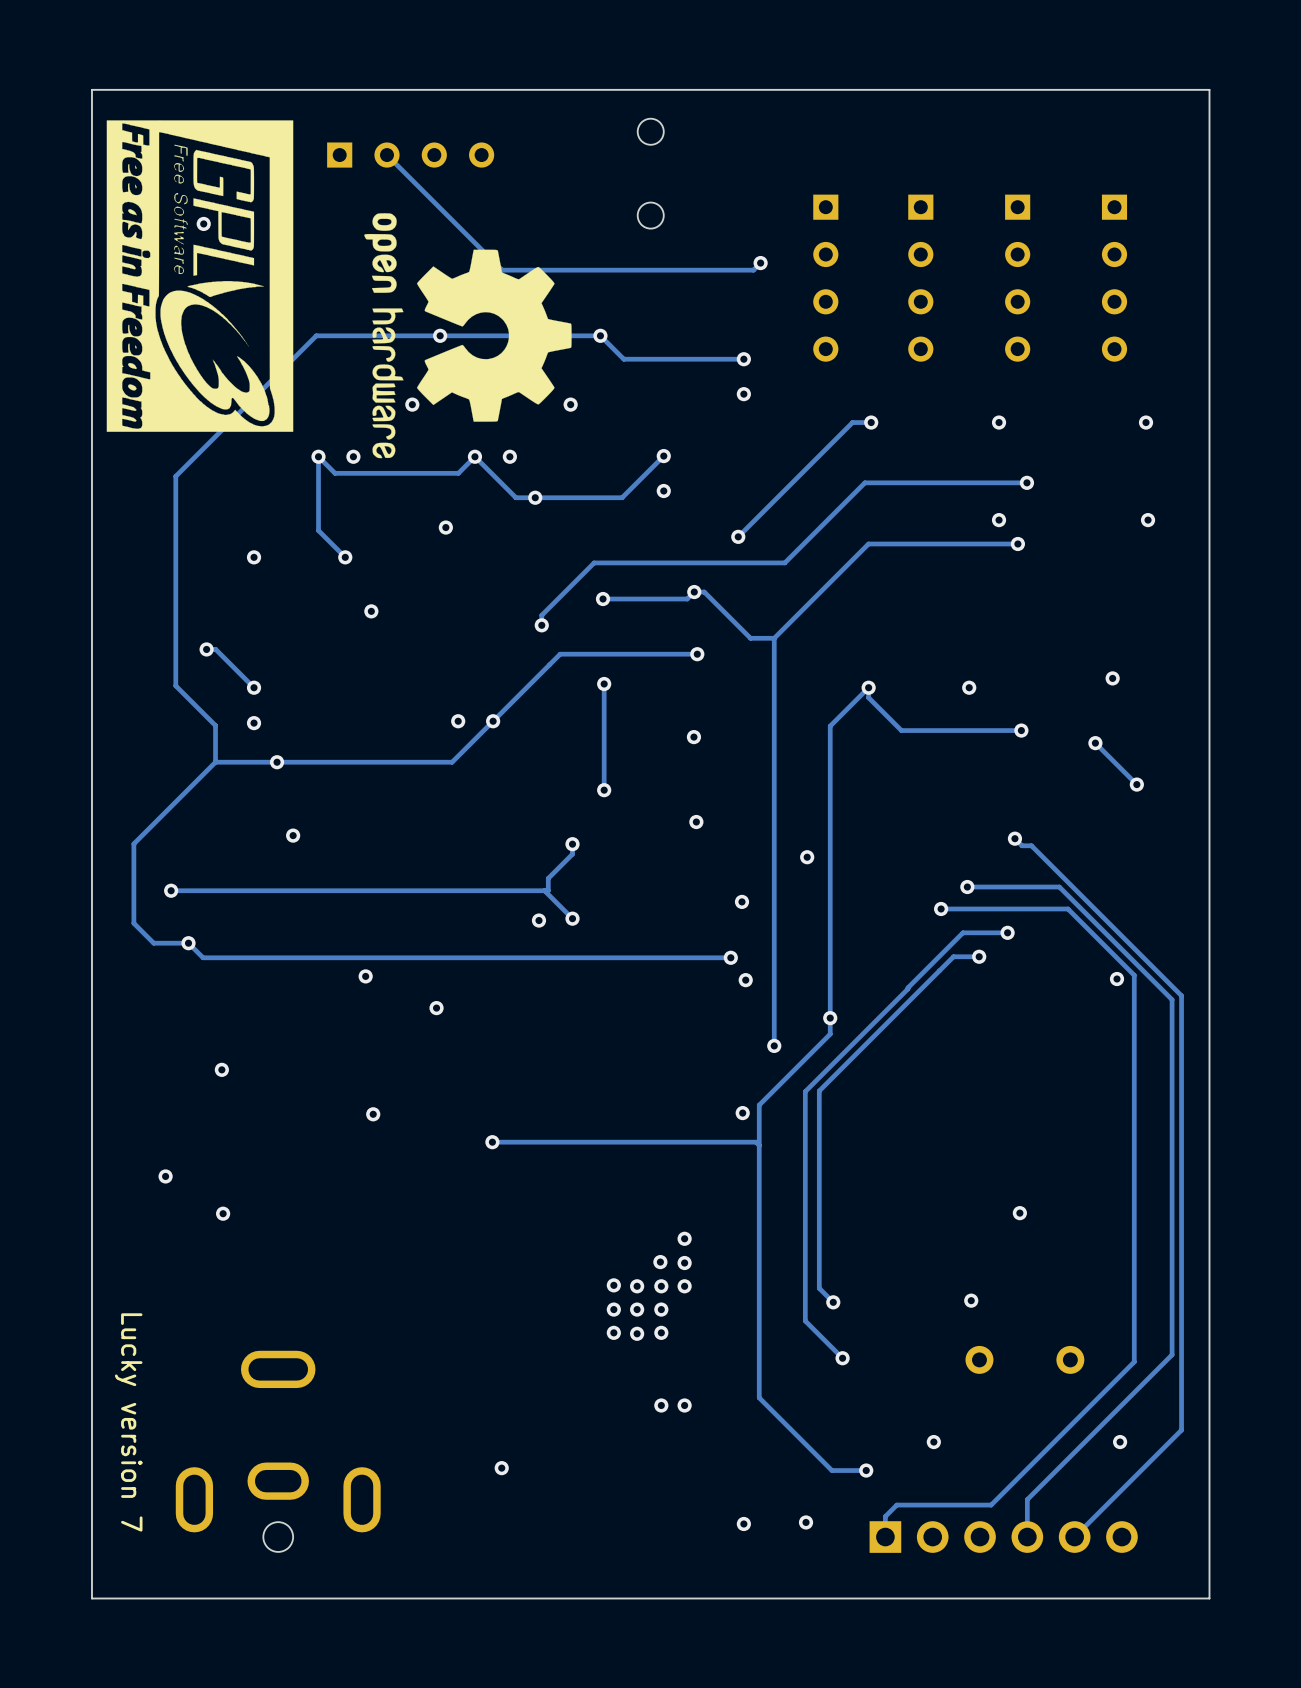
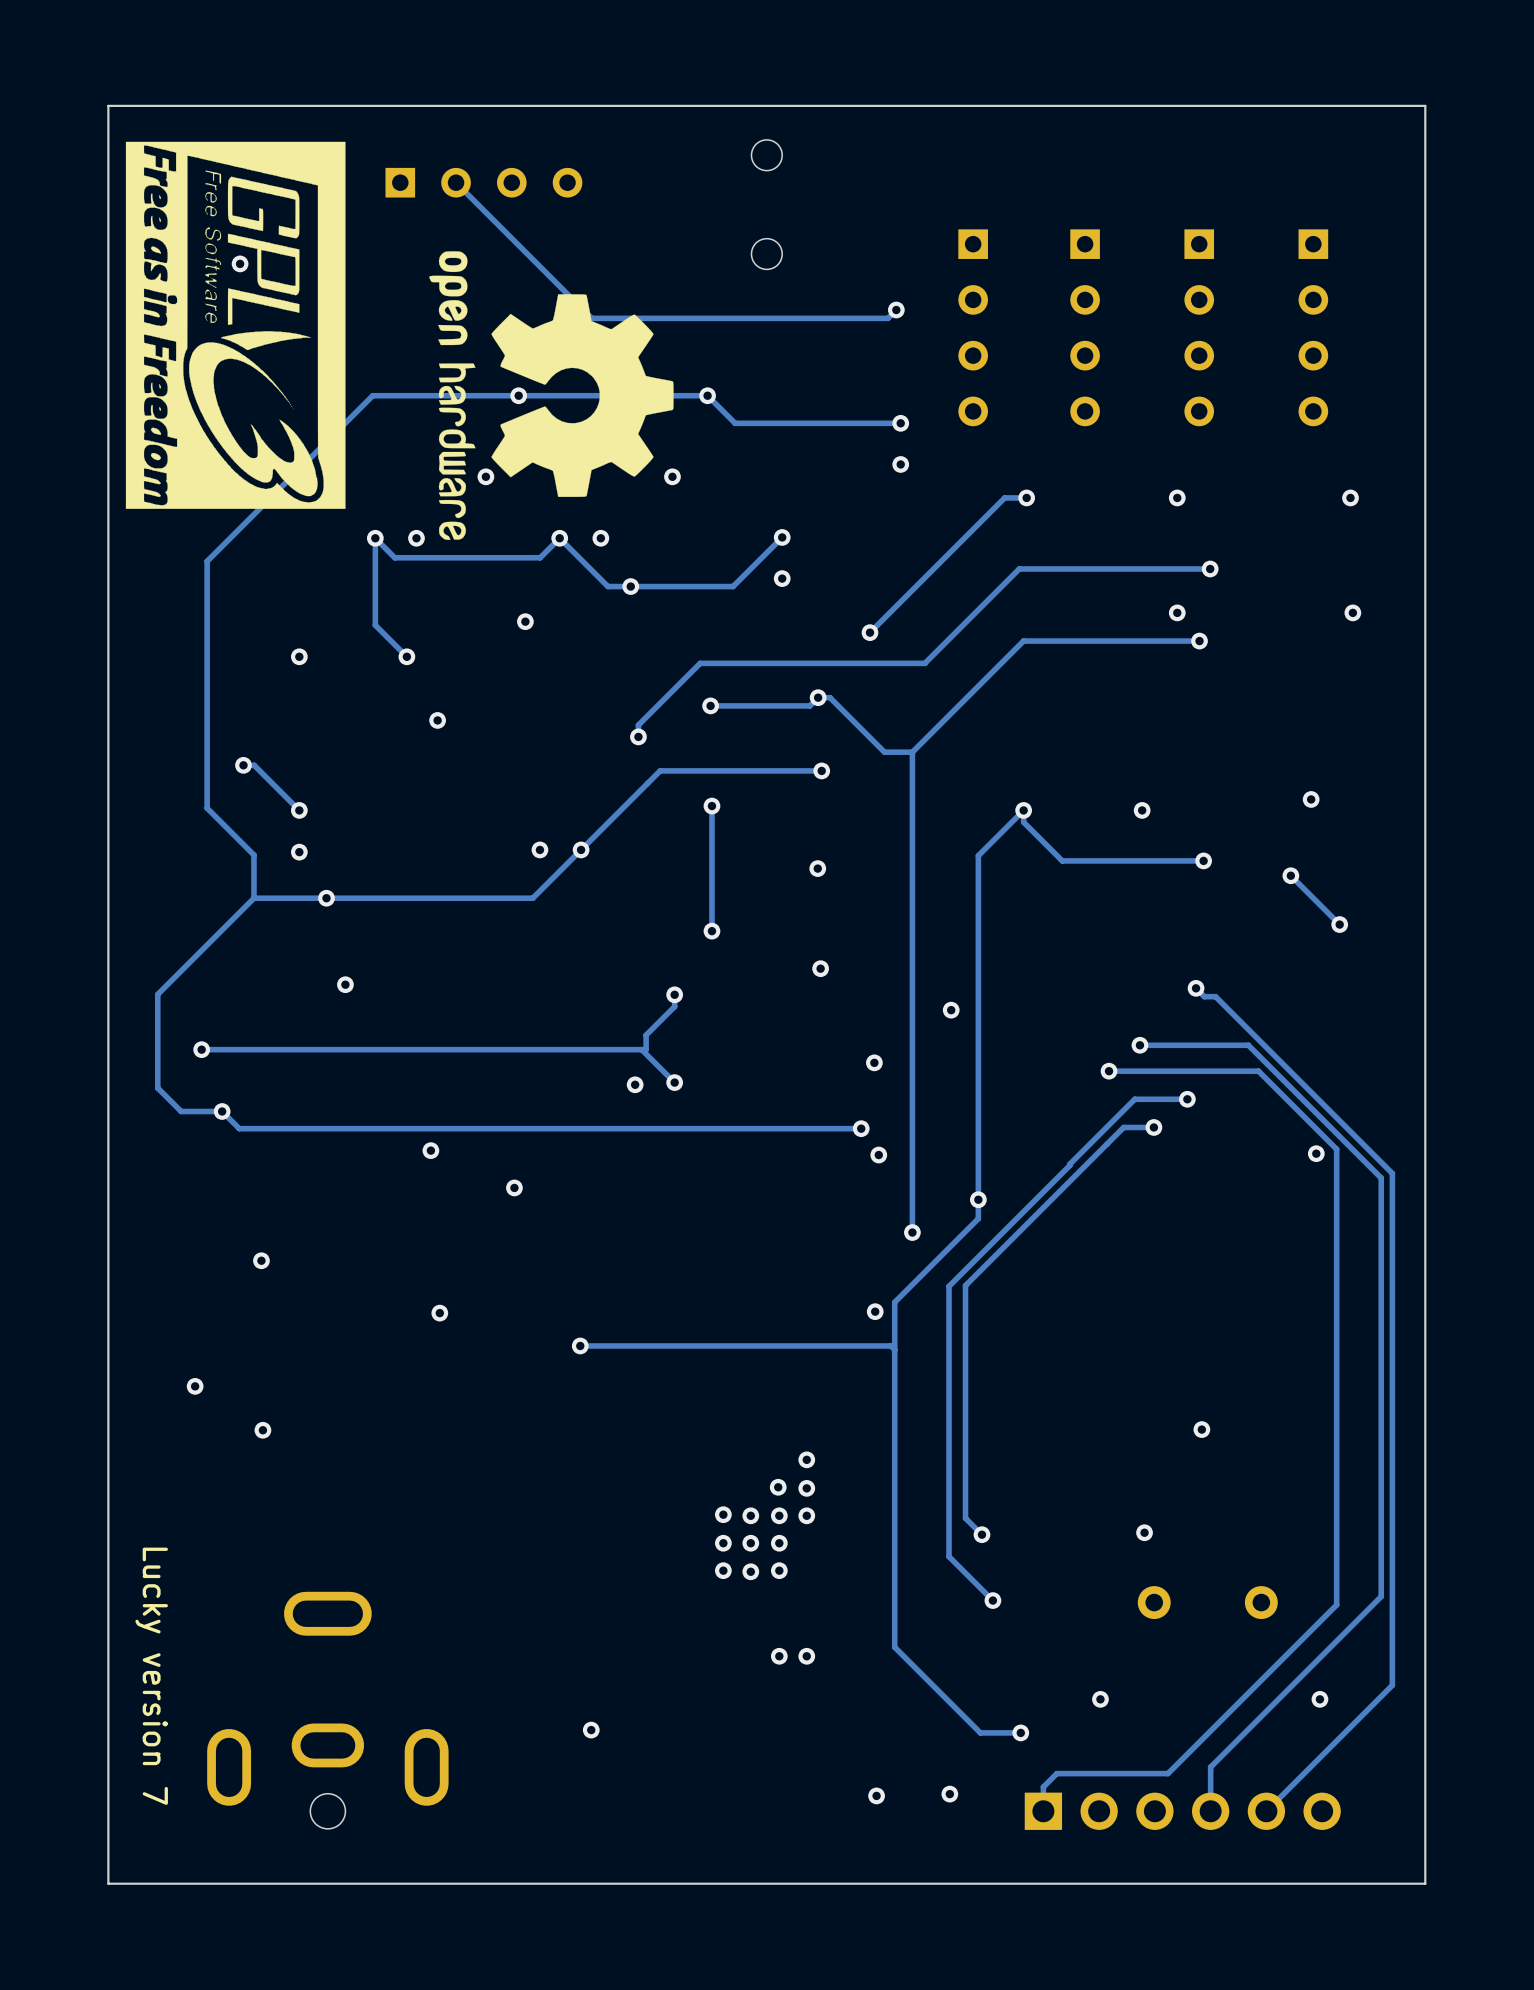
via: (743, 359) -> none
track: none -> (900, 423) (876, 423)
via: none -> (900, 423)
via: (743, 394) -> none
via: none -> (900, 464)

